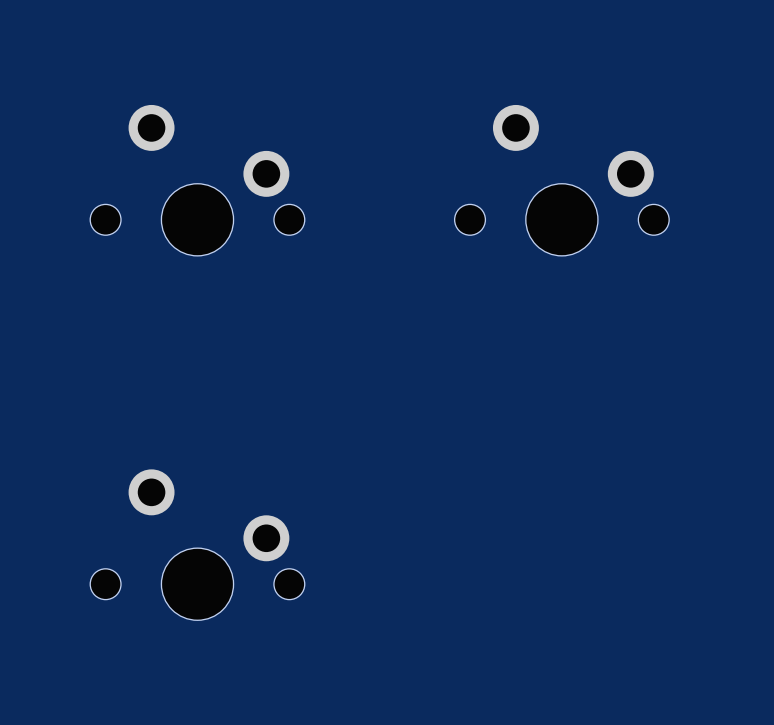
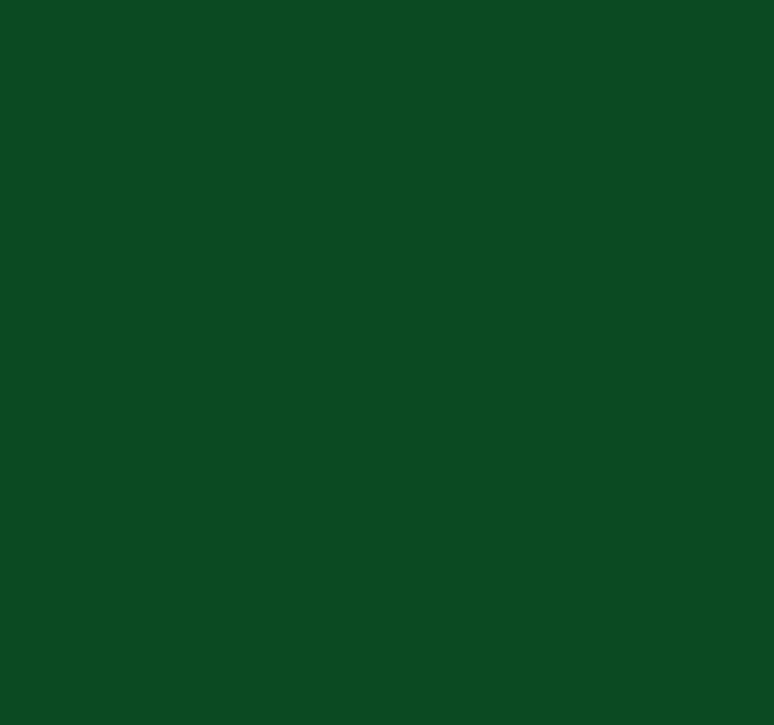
part: (197, 180) -> none
part: (561, 180) -> none
part: (197, 544) -> none

